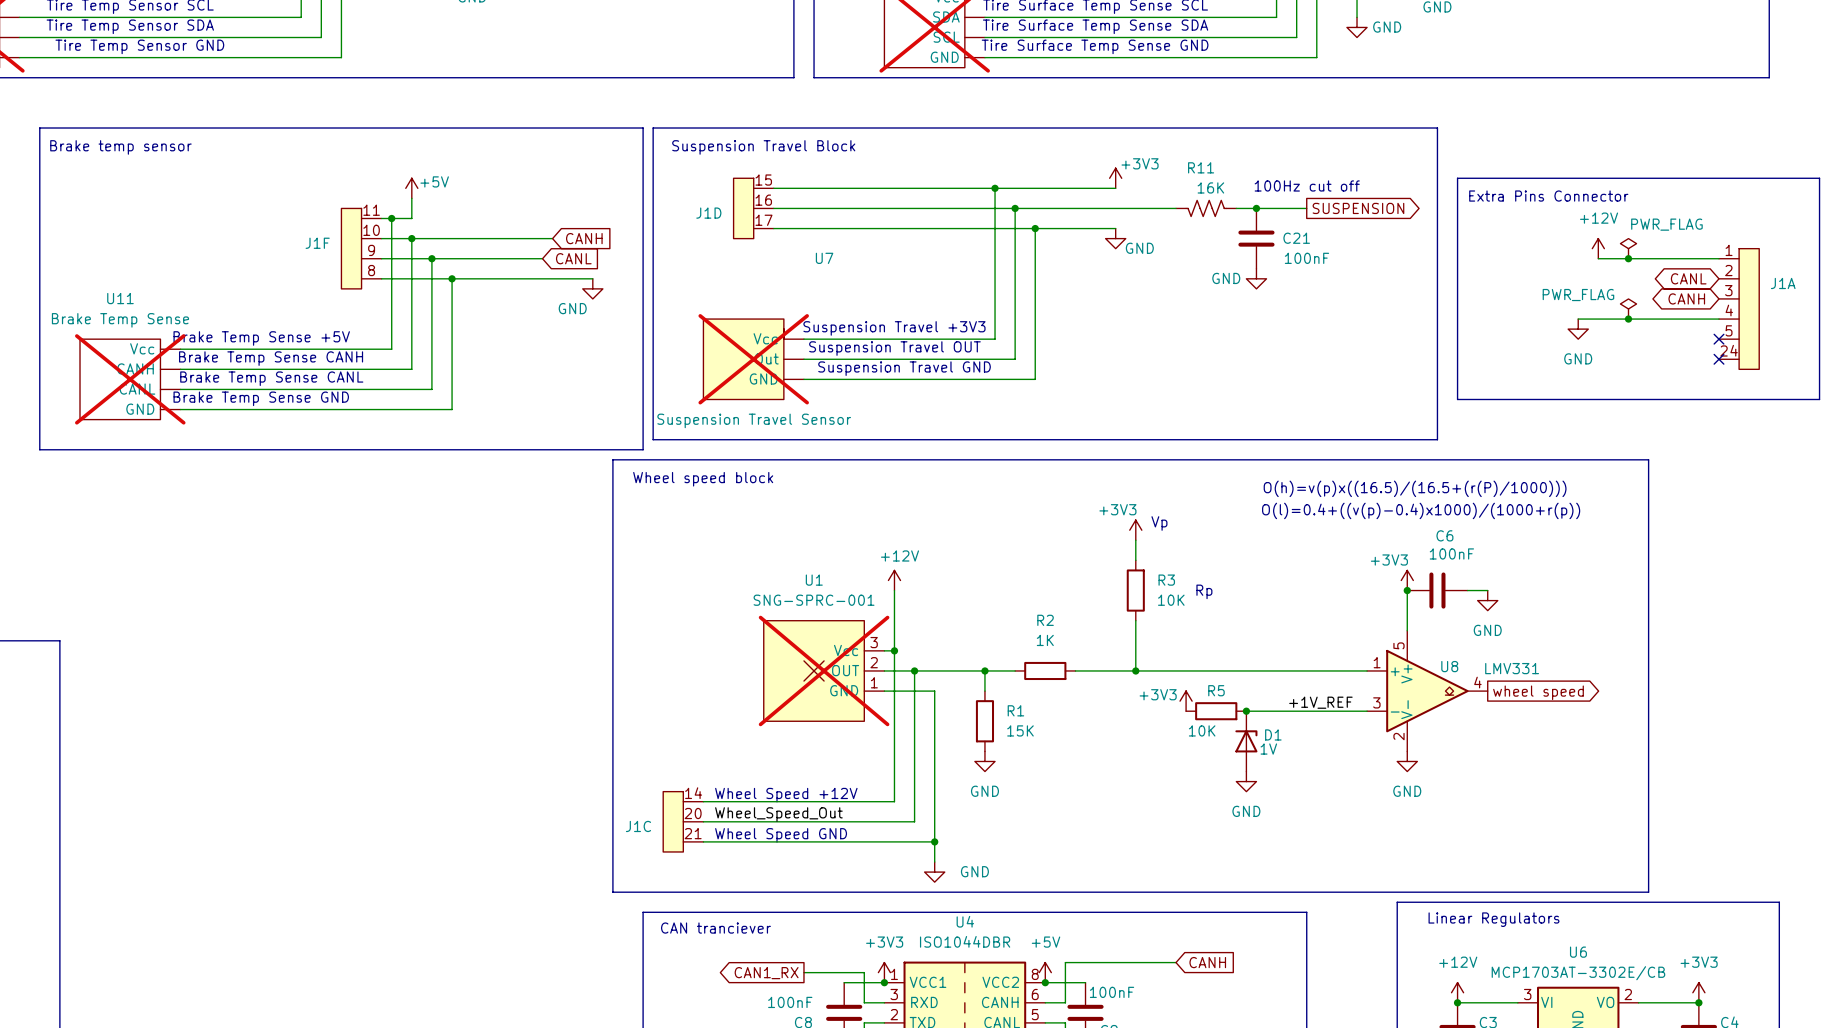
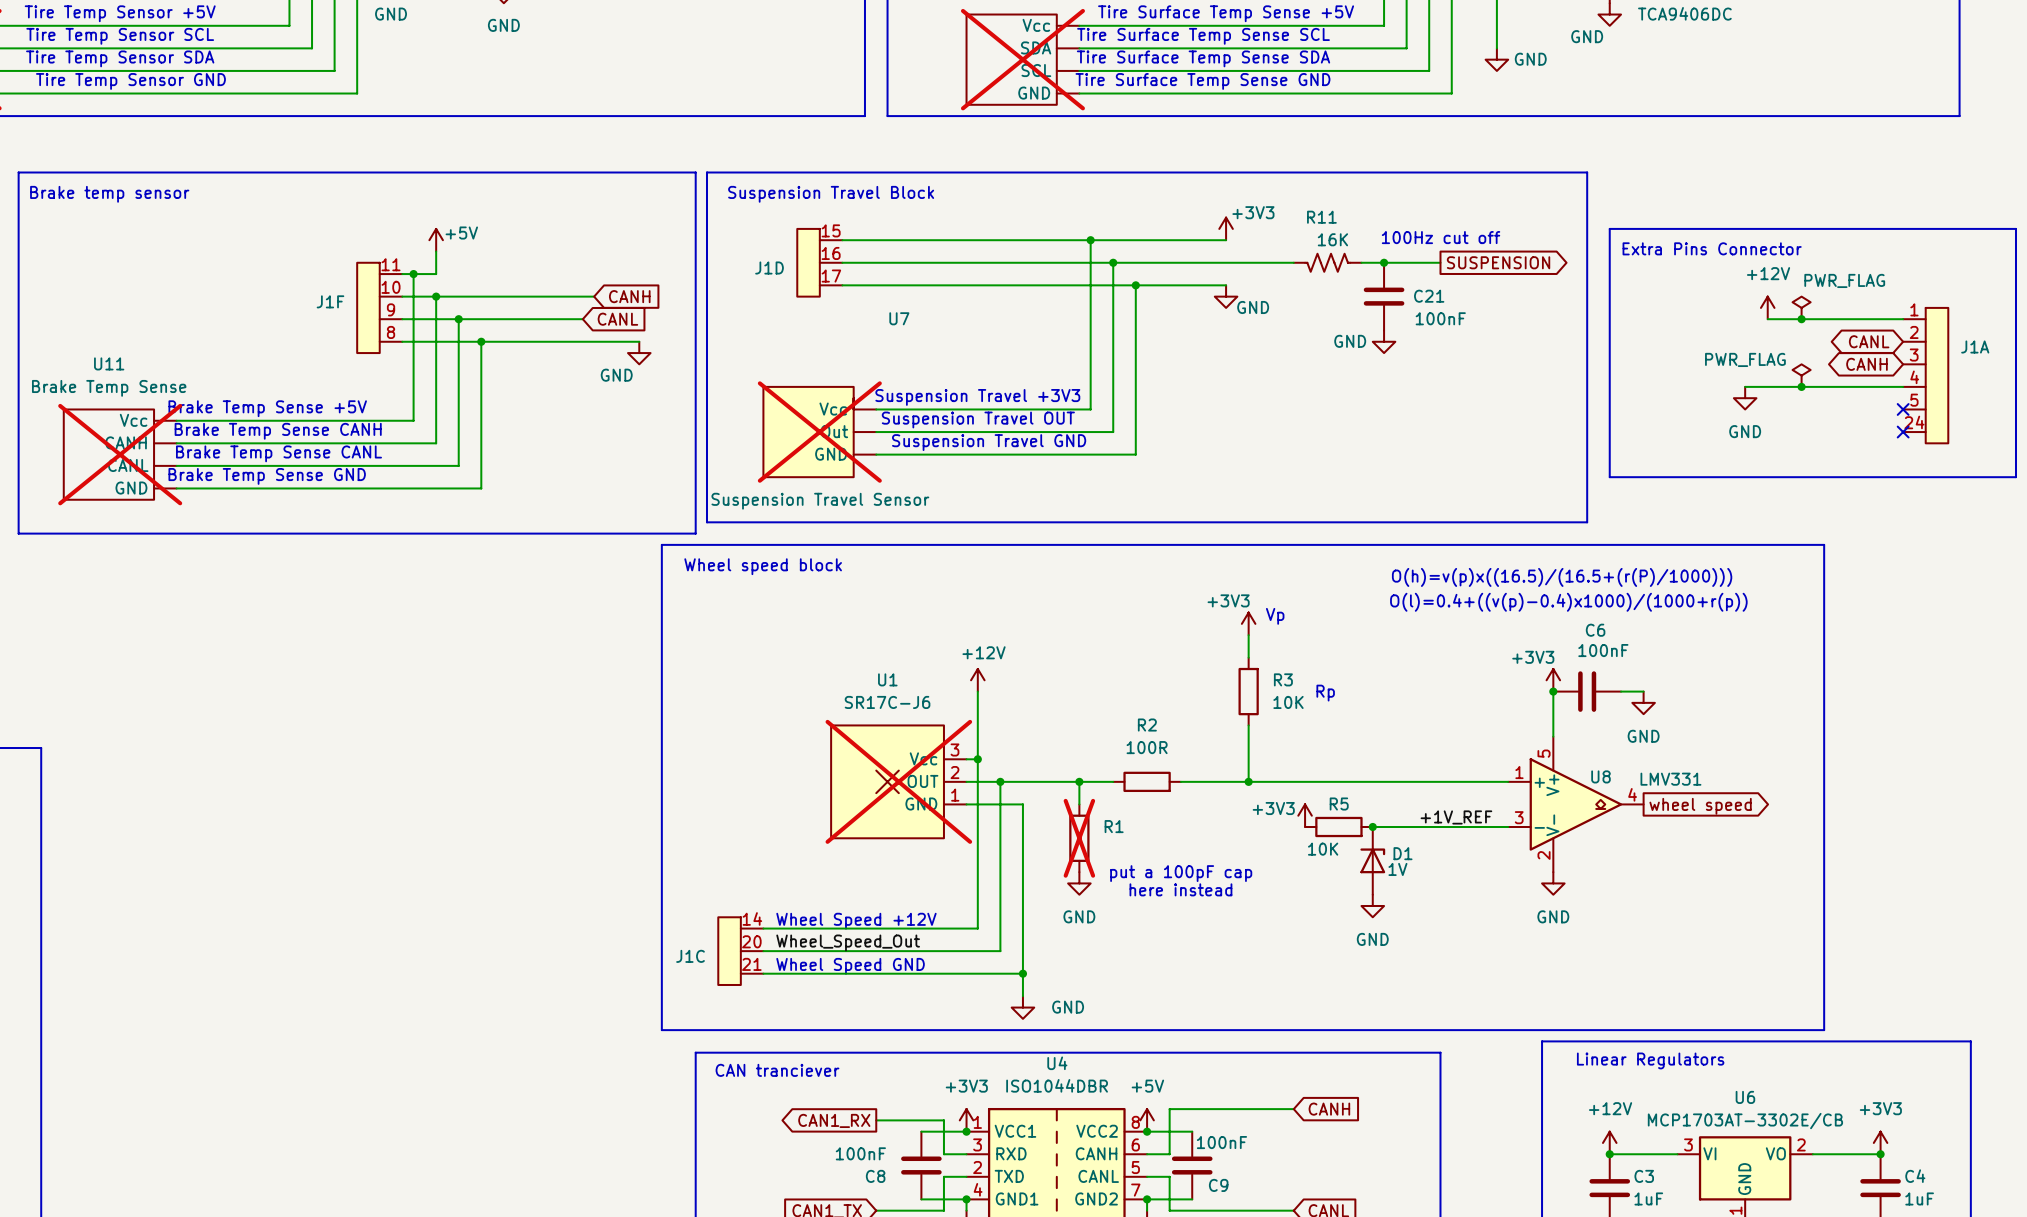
U1 value: SNG-SPRC-001 (814, 600) -> SR17C-J6 (887, 702)
R2 value: 1K (1045, 640) -> 100R (1147, 747)
R1 do-not-place cross: none -> (1079, 838)
R1 value: 15K (1020, 730) -> none
text: none -> put a 100pF cap (1181, 873)
text: none -> here instead (1180, 889)

